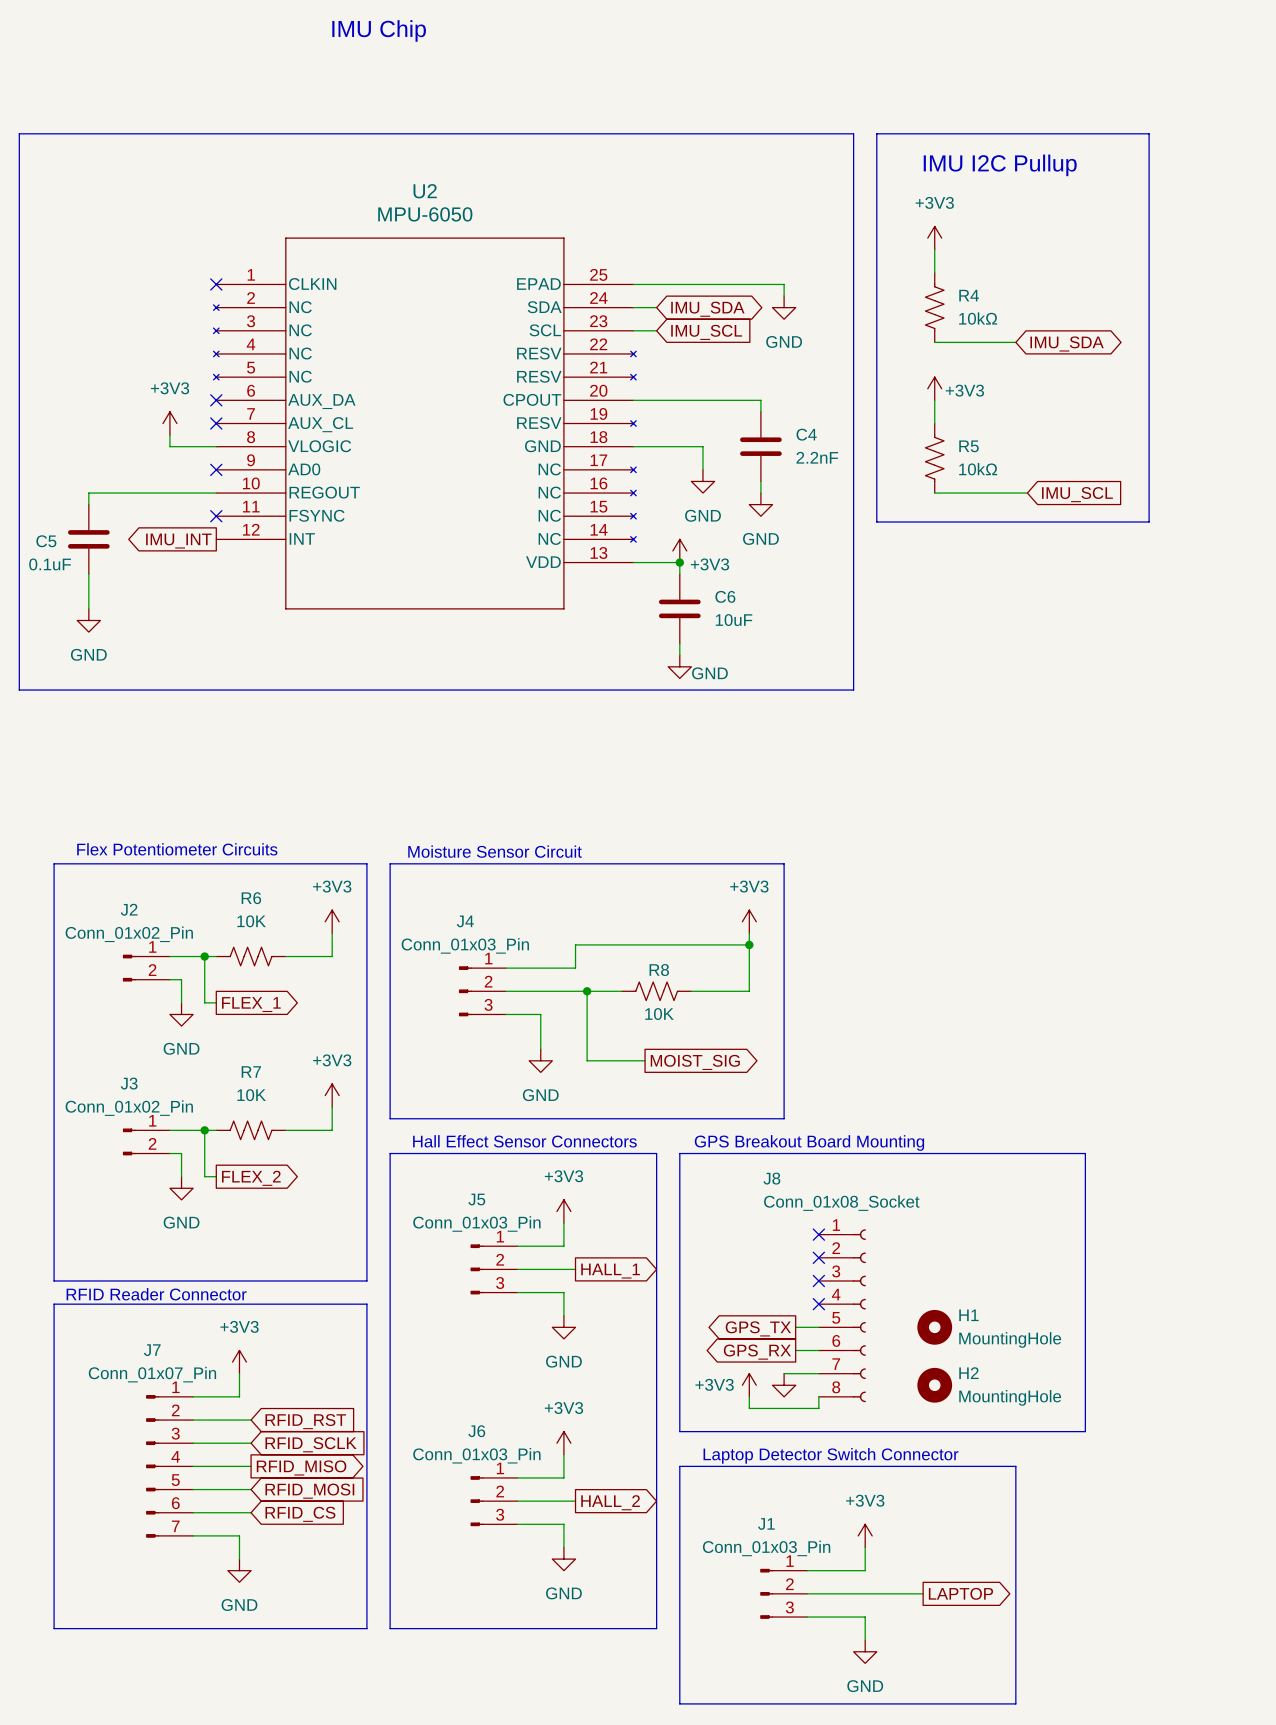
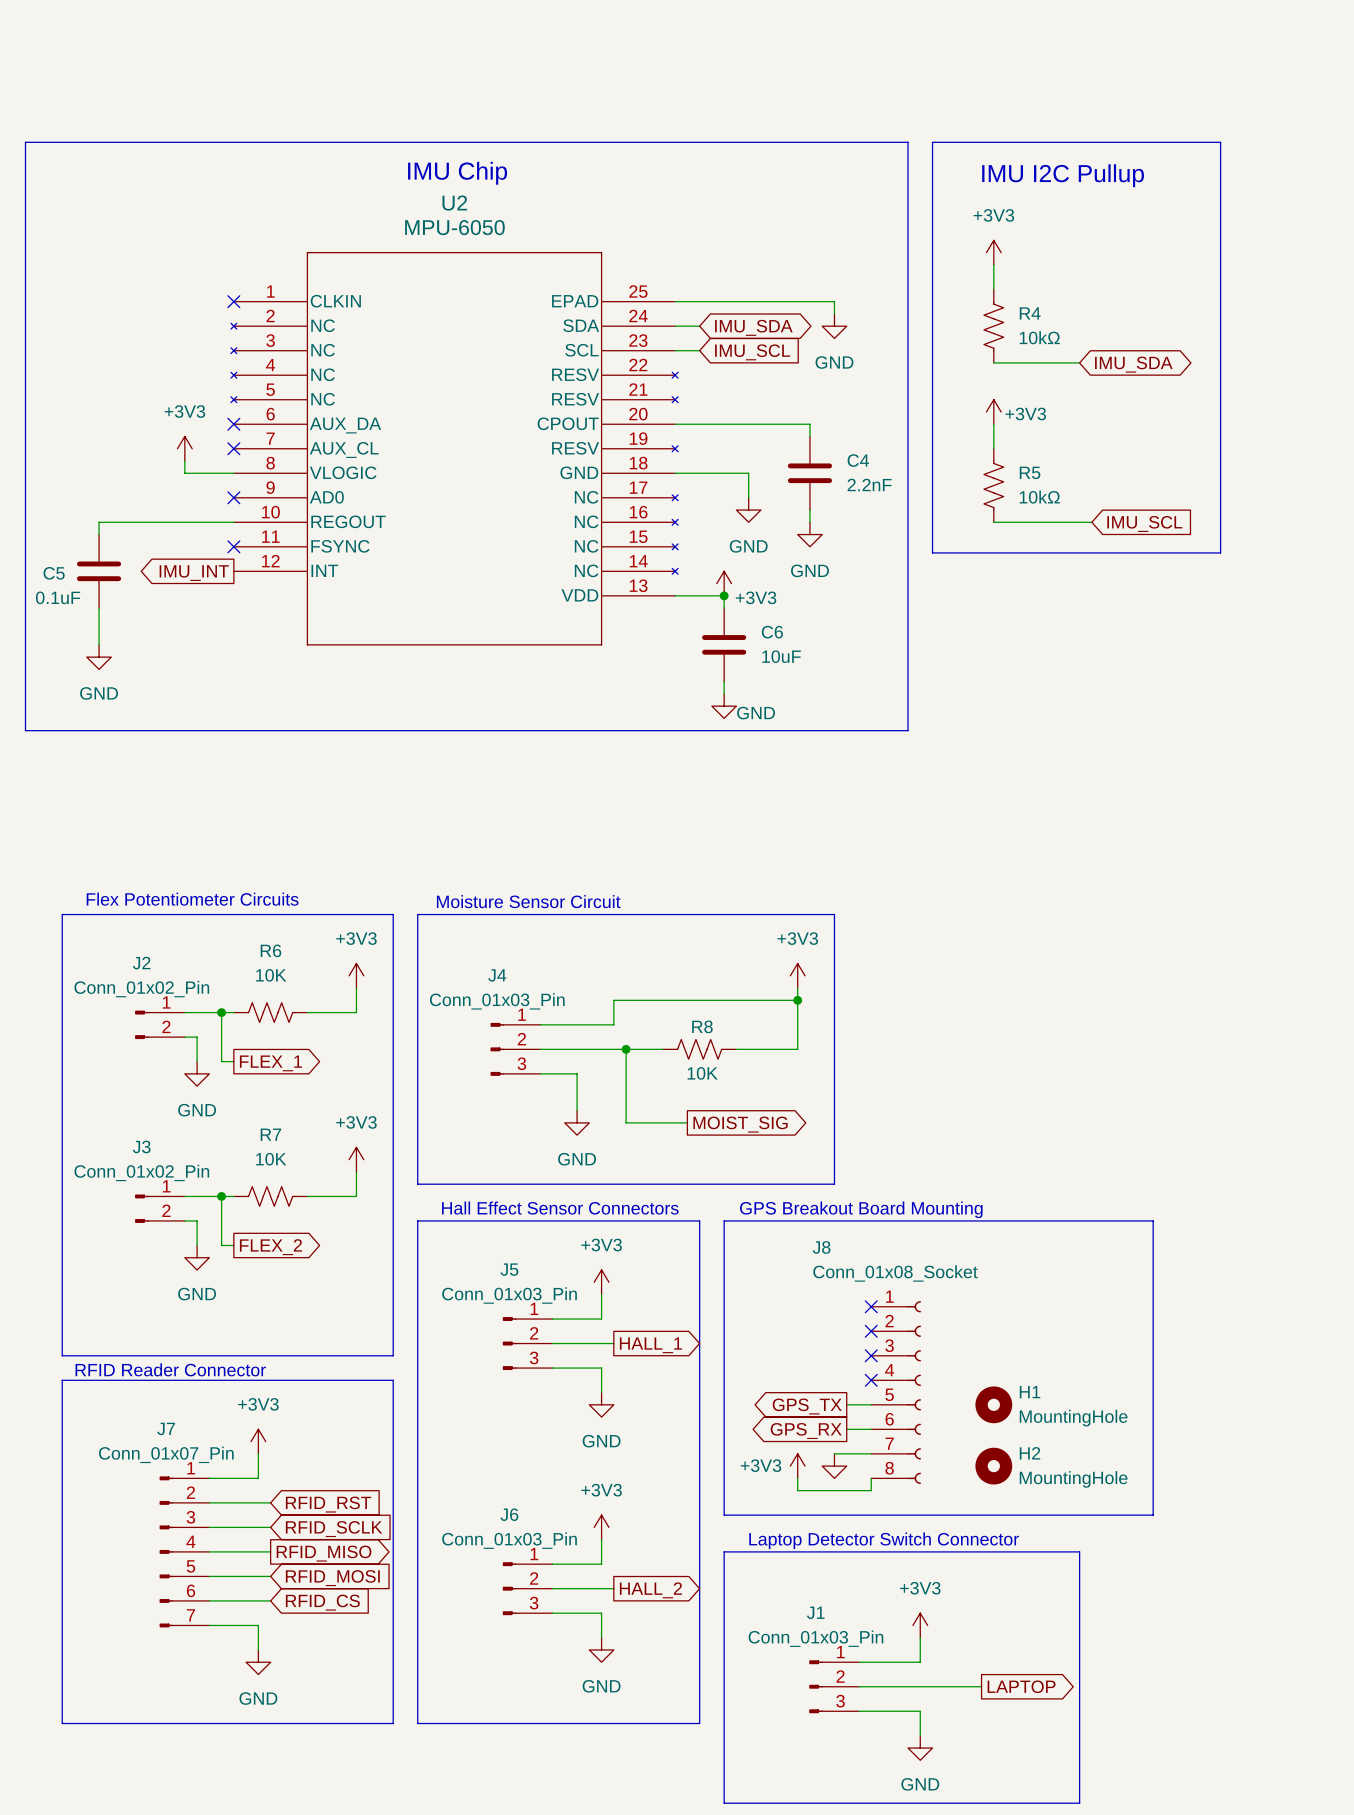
text position: IMU Chip (379, 30) -> IMU Chip (457, 173)

